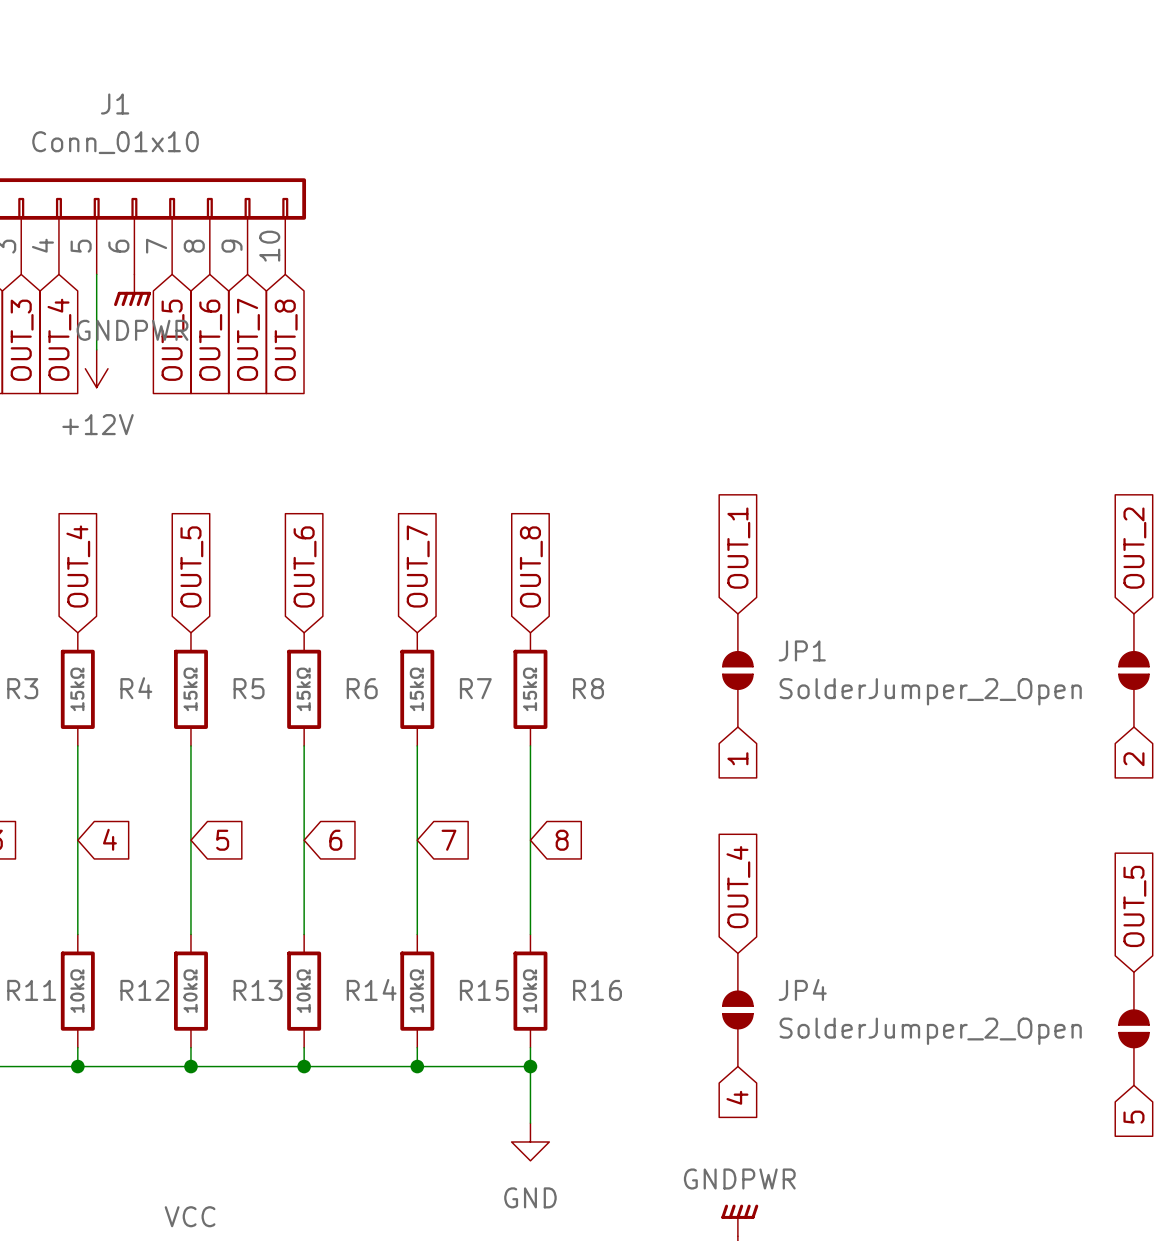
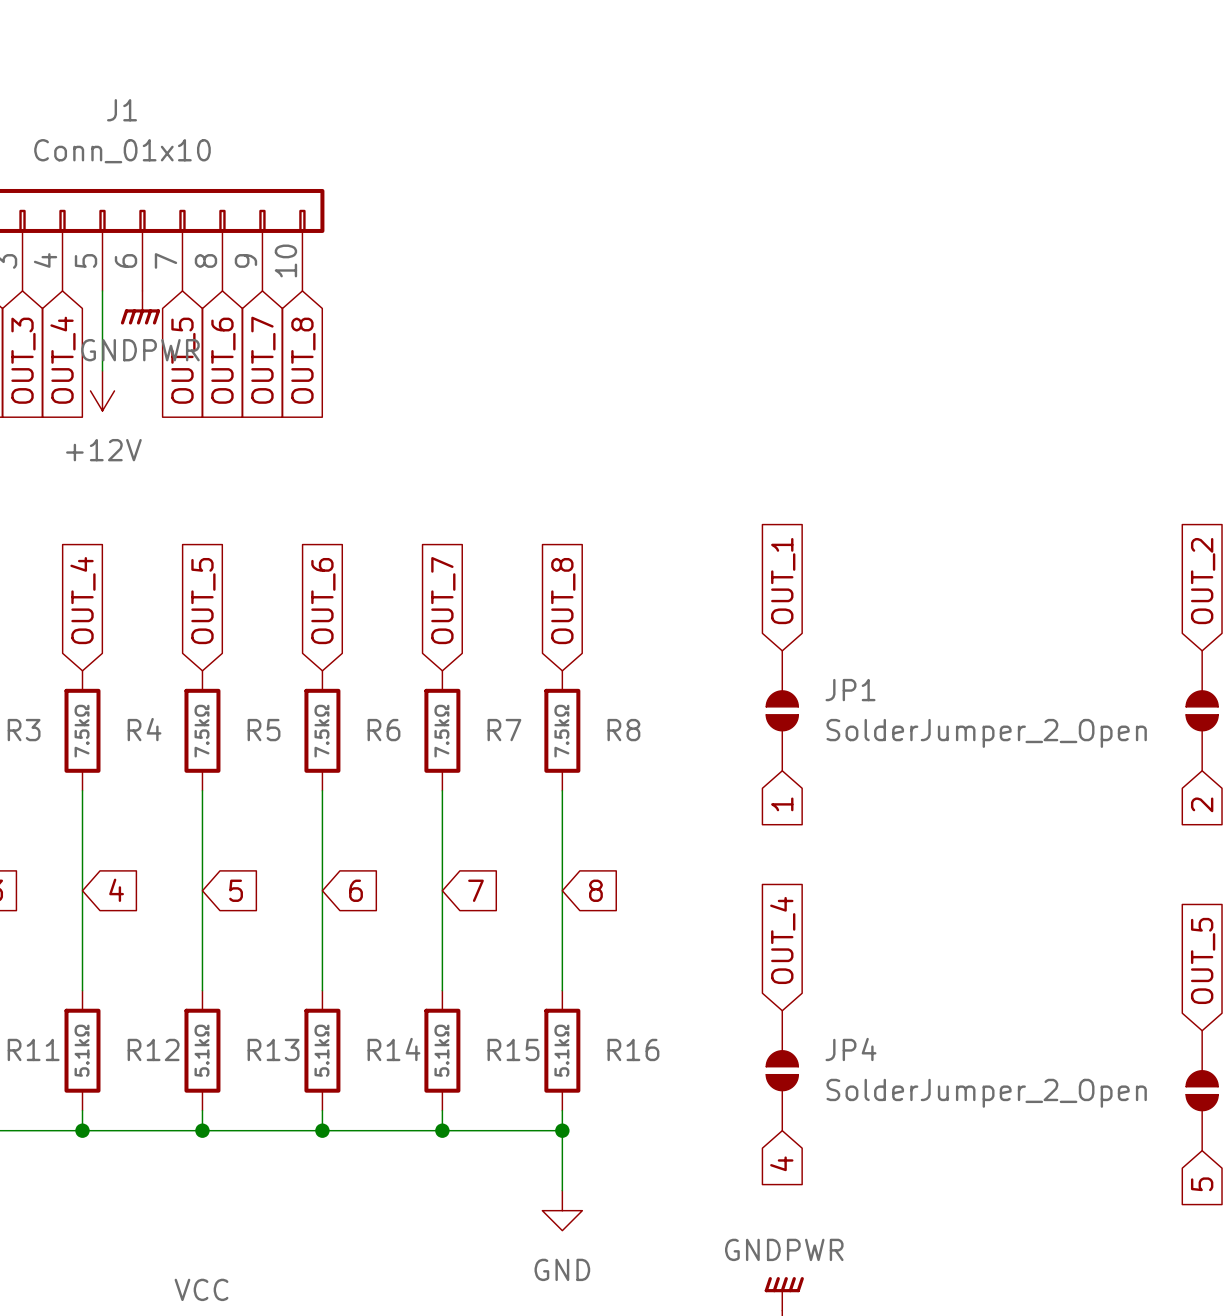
R4 value: 15kΩ (77, 689) -> 7.5kΩ (82, 731)
R5 value: 15kΩ (190, 689) -> 7.5kΩ (201, 731)
R6 value: 15kΩ (303, 689) -> 7.5kΩ (321, 731)
R7 value: 15kΩ (416, 689) -> 7.5kΩ (441, 731)
R8 value: 15kΩ (530, 689) -> 7.5kΩ (561, 731)
R12 value: 10kΩ (77, 991) -> 5.1kΩ (82, 1050)
R13 value: 10kΩ (190, 991) -> 5.1kΩ (201, 1050)
R14 value: 10kΩ (303, 991) -> 5.1kΩ (321, 1050)
R15 value: 10kΩ (416, 991) -> 5.1kΩ (441, 1050)
R16 value: 10kΩ (530, 991) -> 5.1kΩ (561, 1050)

